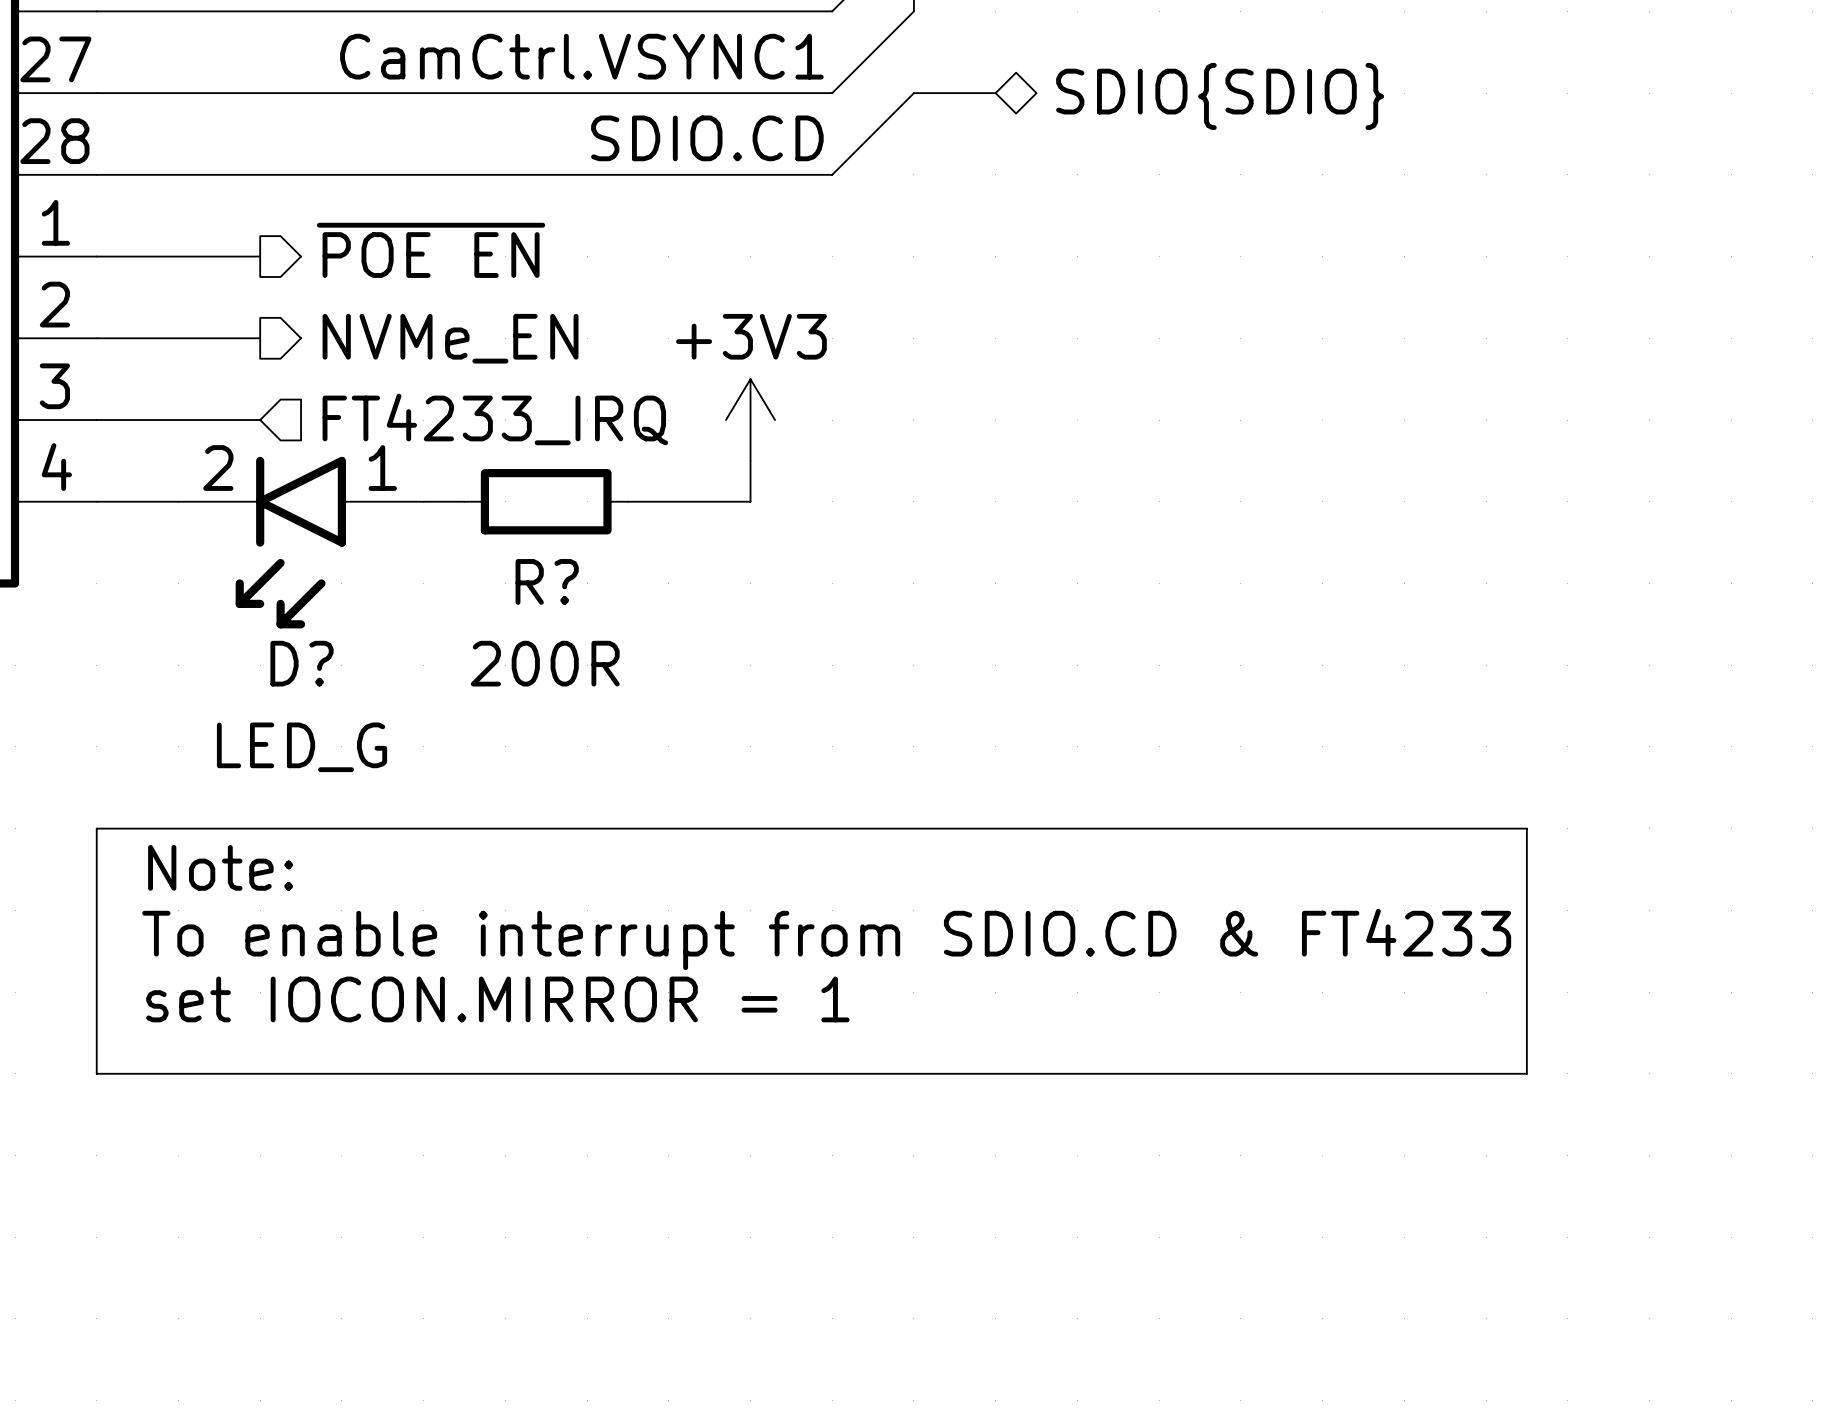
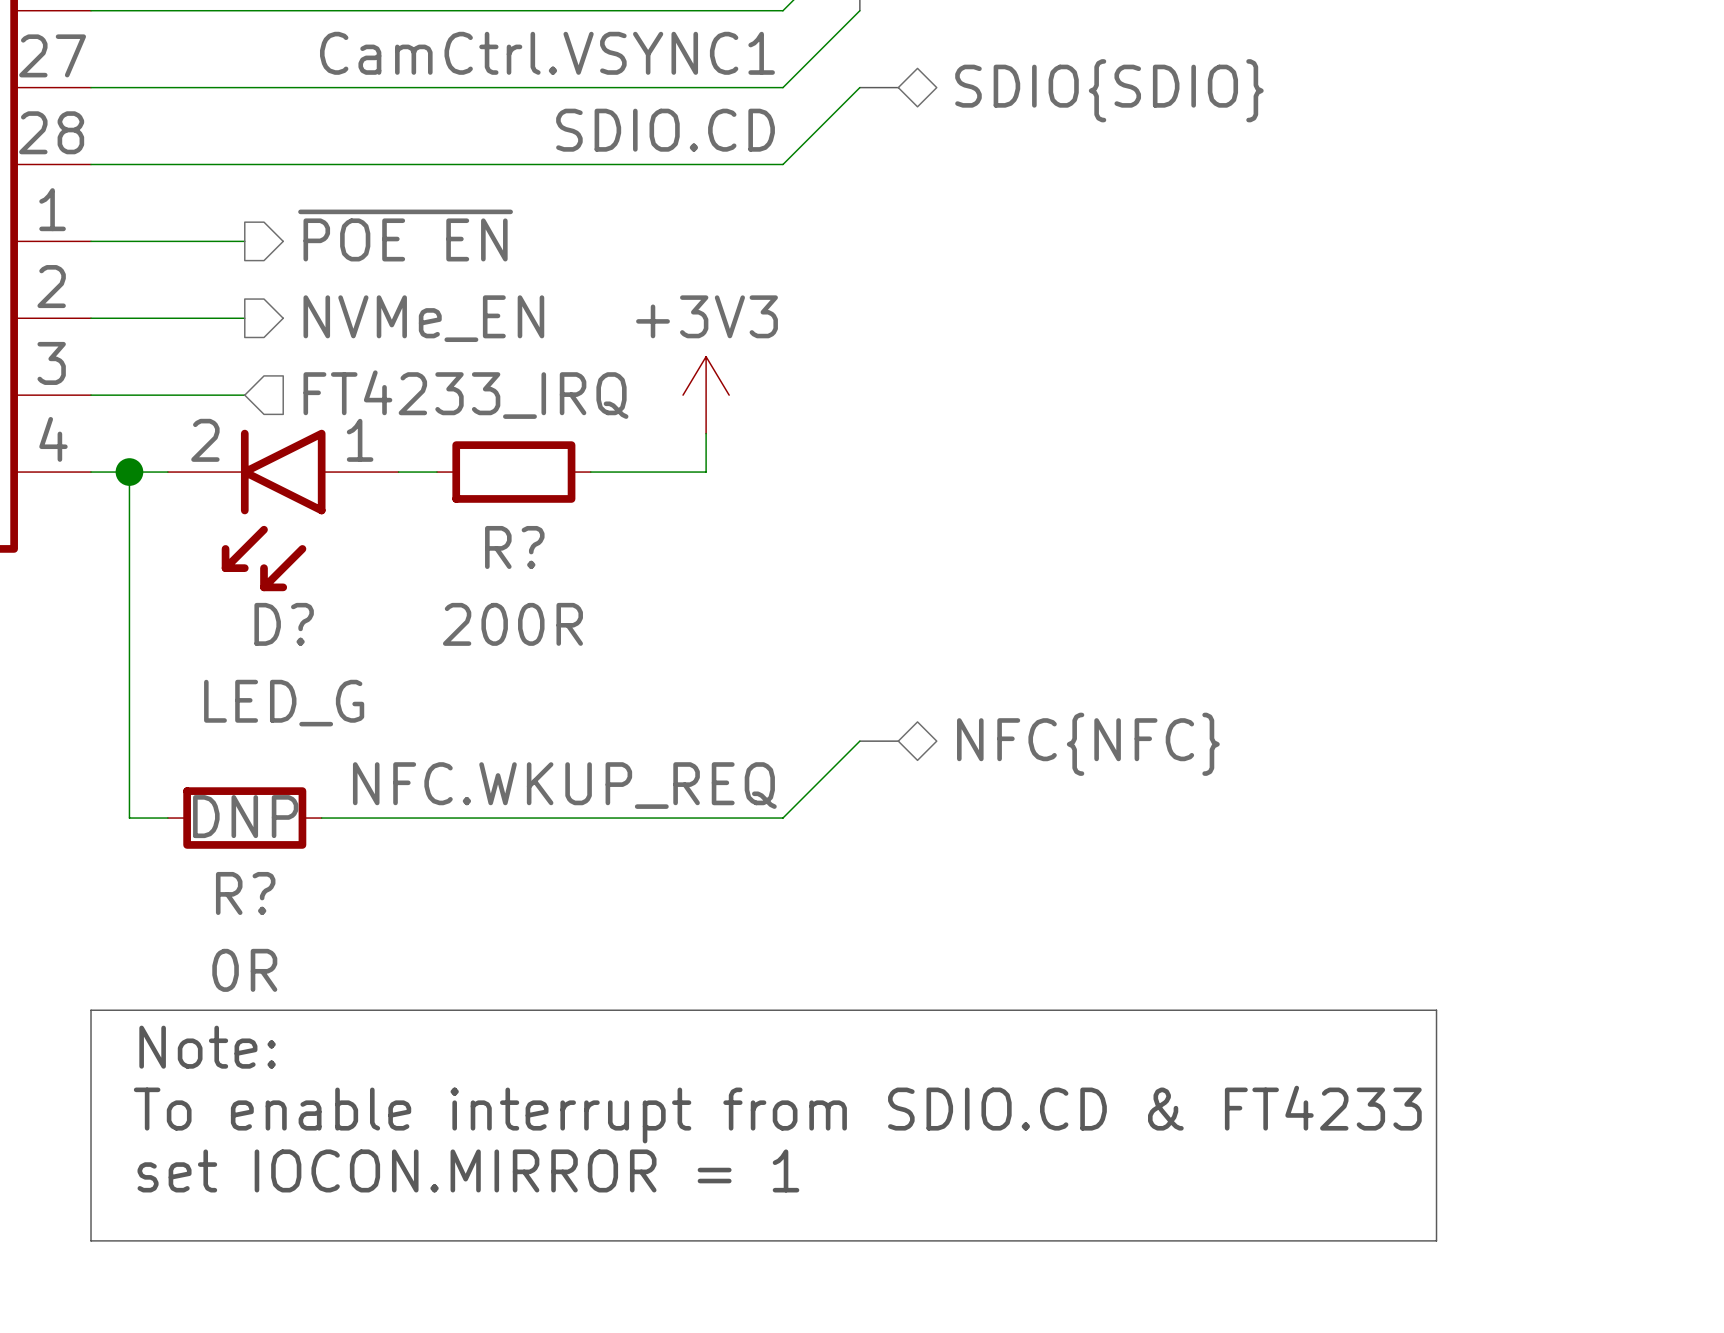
bus: (954, 93) (995, 93) -> (859, 741) (898, 741)
hierarchical label position: SDIO{SDIO} (1220, 96) -> SDIO{SDIO} (1109, 90)
wire: none -> (129, 472) (129, 818) (167, 818)
junction: none -> (129, 472)
wire: none -> (859, 741) (782, 818) (321, 818)
hierarchical label: none -> NFC{NFC} (1088, 744)
label: none -> NFC.WKUP_REQ (564, 785)
text position: Note: (220, 867) -> Note: (207, 1047)
R?: none -> (244, 818)
text position: To enable interrupt from SDIO.CD & FT4233 (826, 939) -> To enable interrupt from SDIO.CD & FT4233 (777, 1114)
text position: set IOCON.MIRROR = 1 (497, 999) -> set IOCON.MIRROR = 1 (468, 1170)
line: (96, 1073) (96, 828) (1526, 828) (1526, 1073) -> (91, 1010) (91, 1240) (1436, 1240) (1436, 1010)

